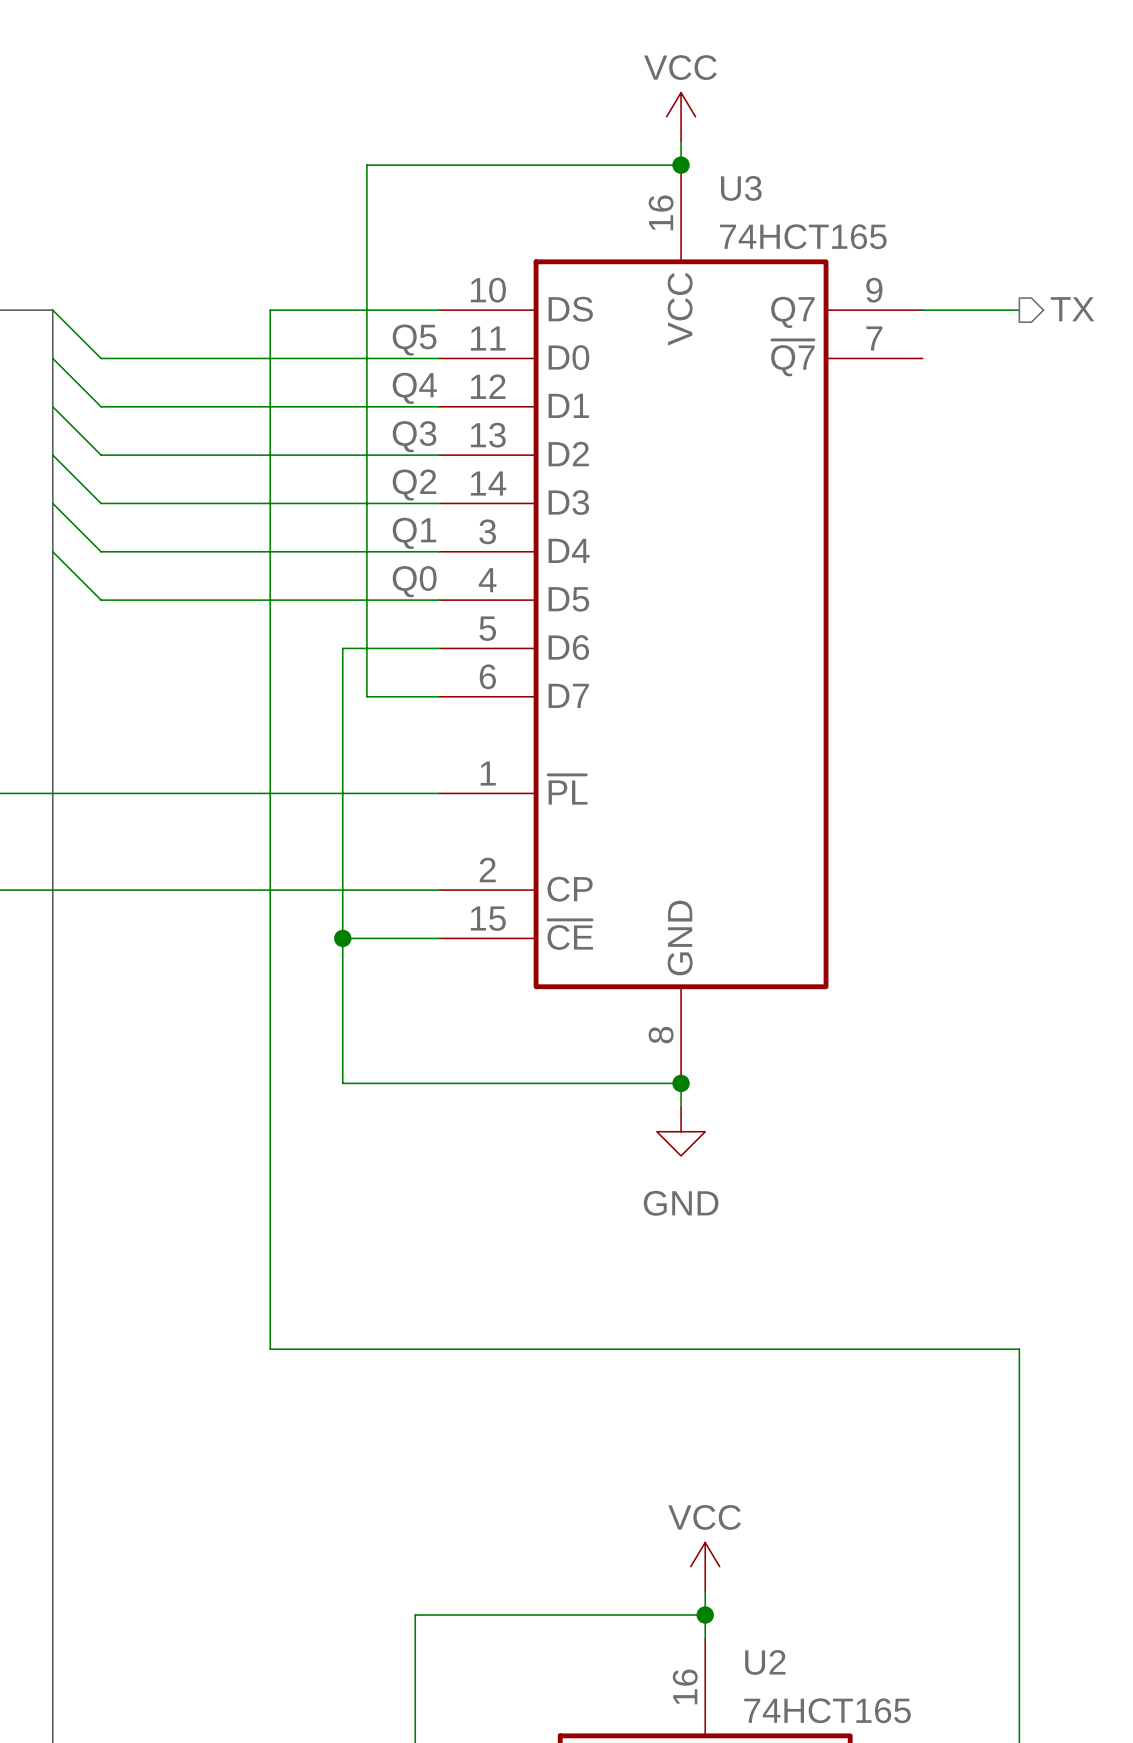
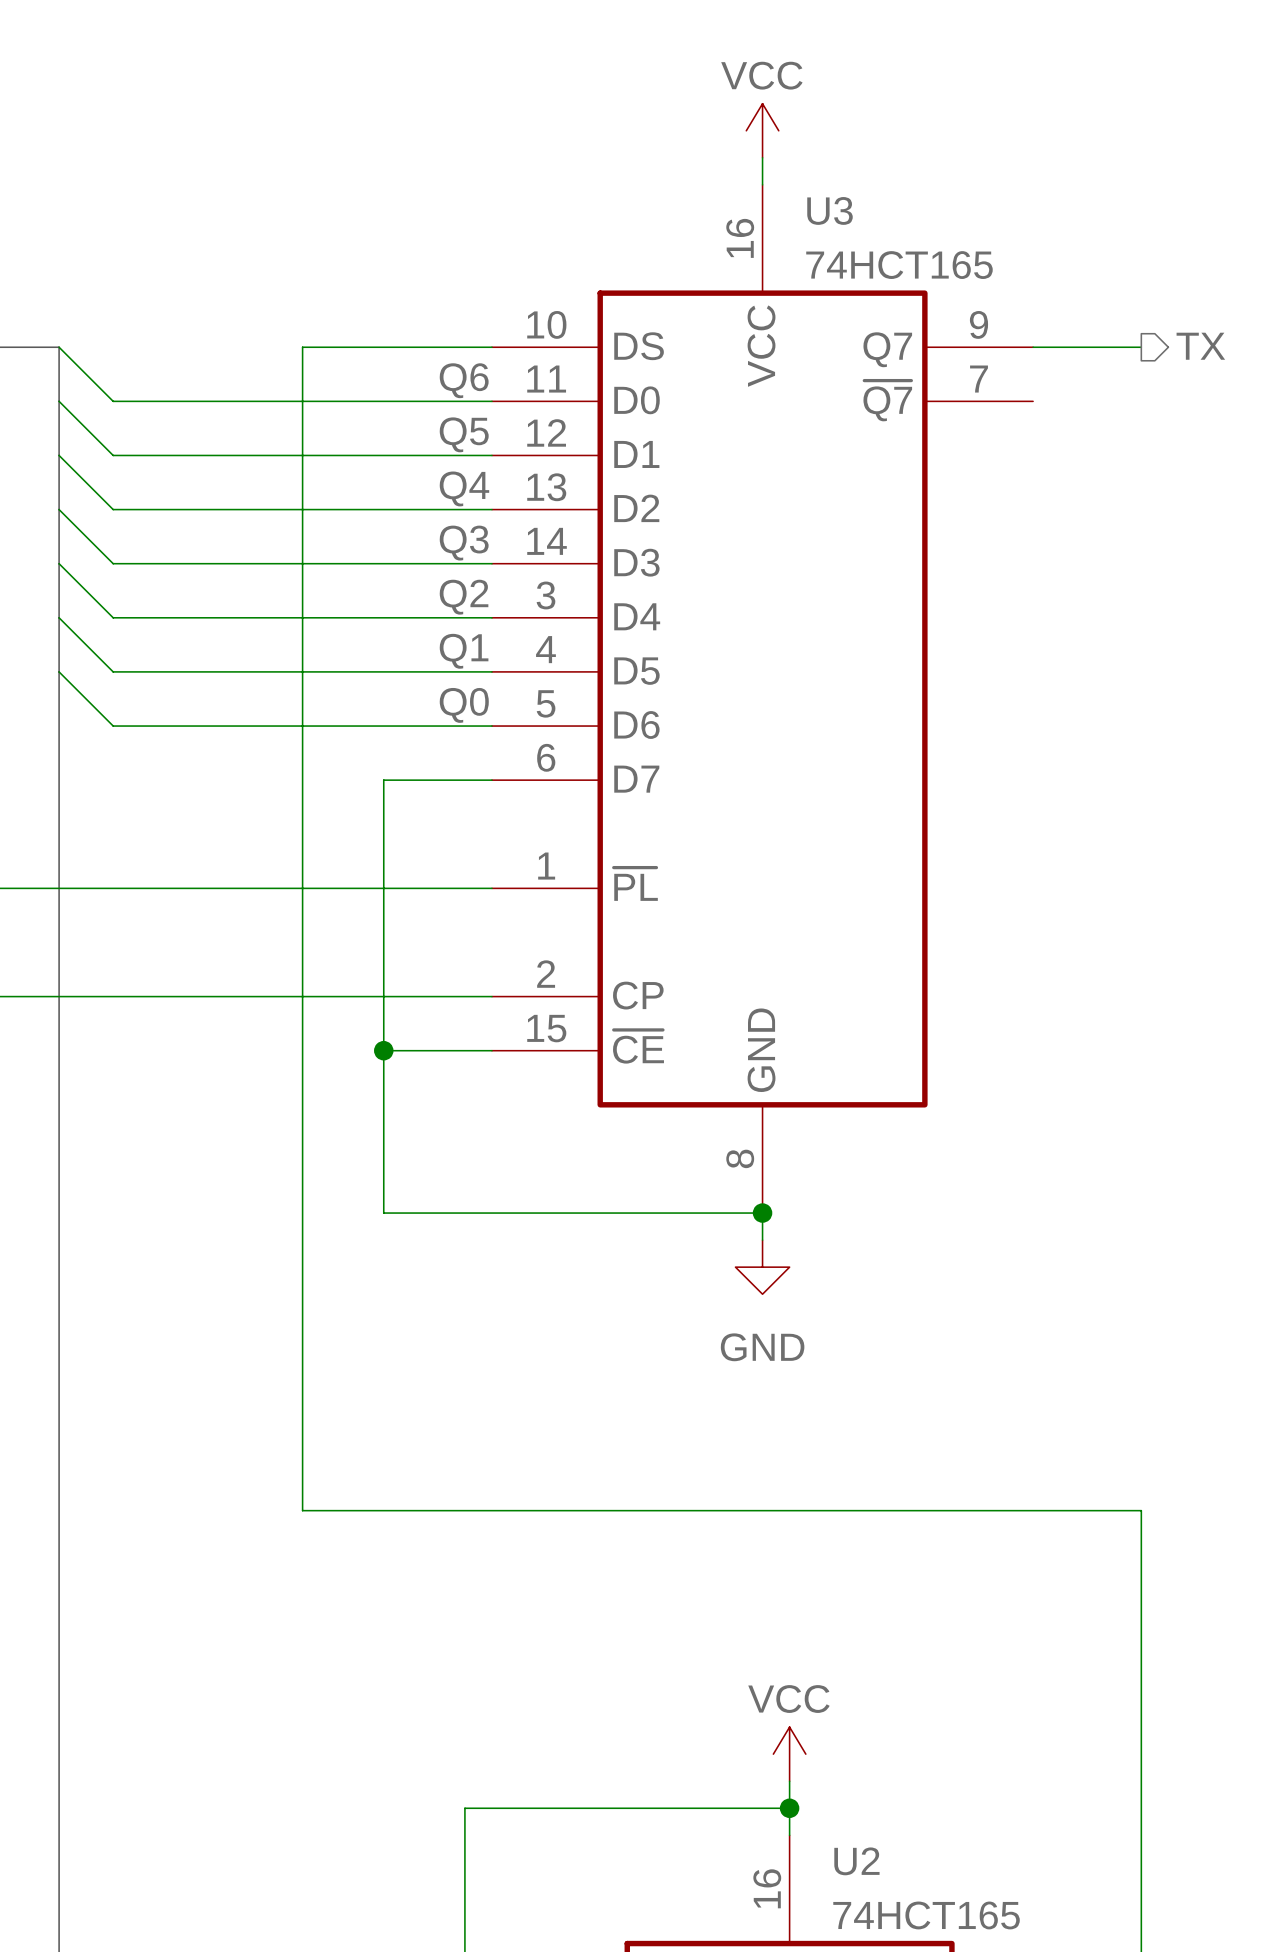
wire: (681, 165) (366, 165) (366, 696) -> none
junction: (681, 165) -> none
label: Q5 (414, 340) -> Q6 (464, 380)
label: Q4 (414, 388) -> Q5 (464, 434)
label: Q3 (414, 436) -> Q4 (464, 488)
label: Q2 (414, 485) -> Q3 (464, 543)
label: Q1 (414, 533) -> Q2 (464, 597)
label: Q0 (414, 581) -> Q1 (464, 651)
wire: none -> (59, 671) (113, 726) (383, 726)
label: none -> Q0 (464, 705)
wire: (342, 648) (342, 696) -> (410, 780) (383, 780)

